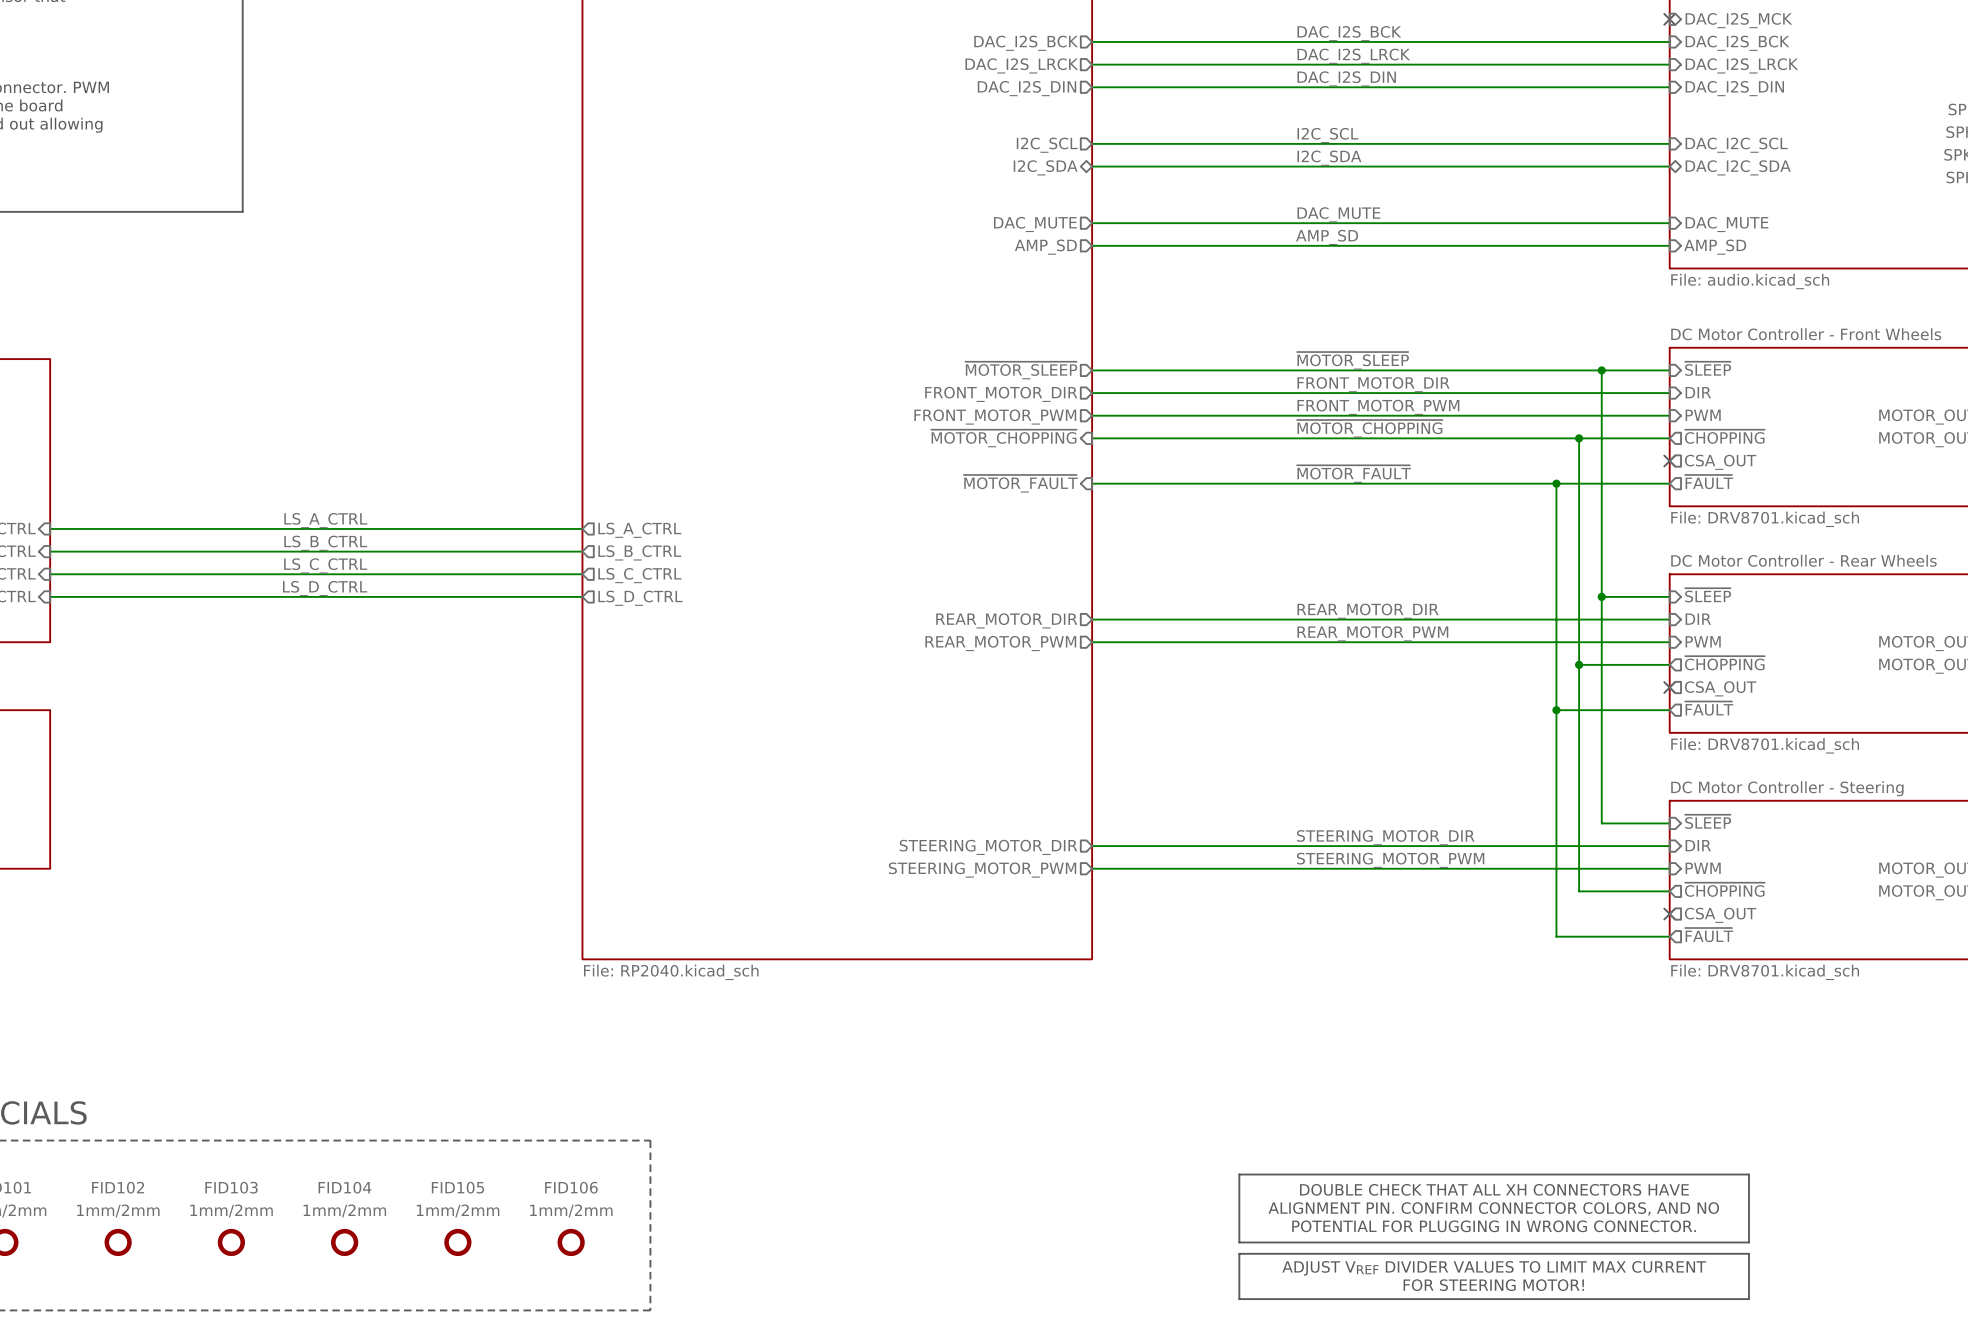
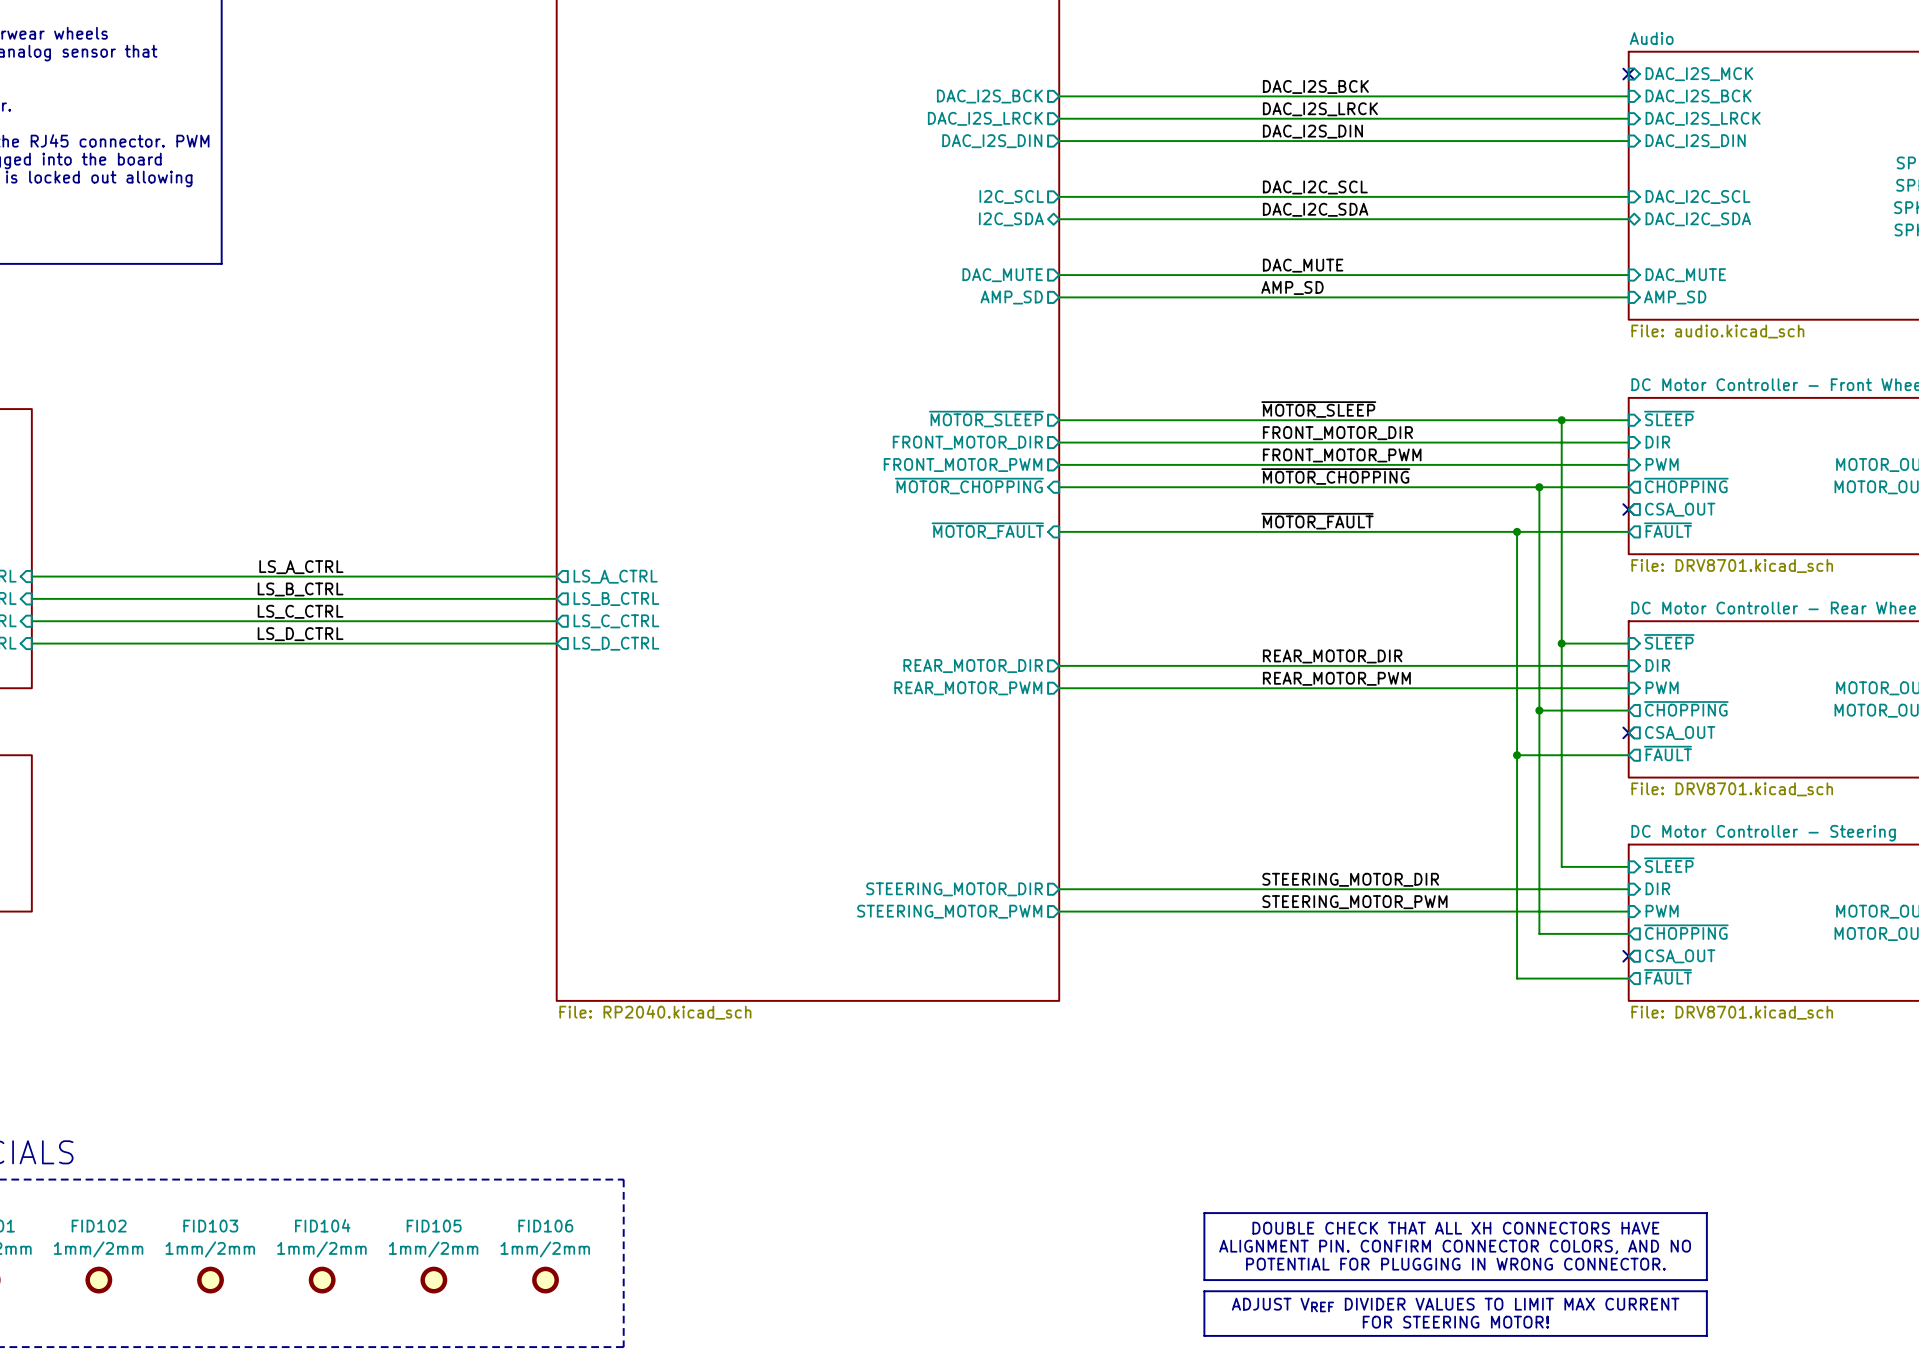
label: I2C_SCL (1327, 135) -> DAC_I2C_SCL (1315, 187)
label: I2C_SDA (1329, 158) -> DAC_I2C_SDA (1315, 209)

